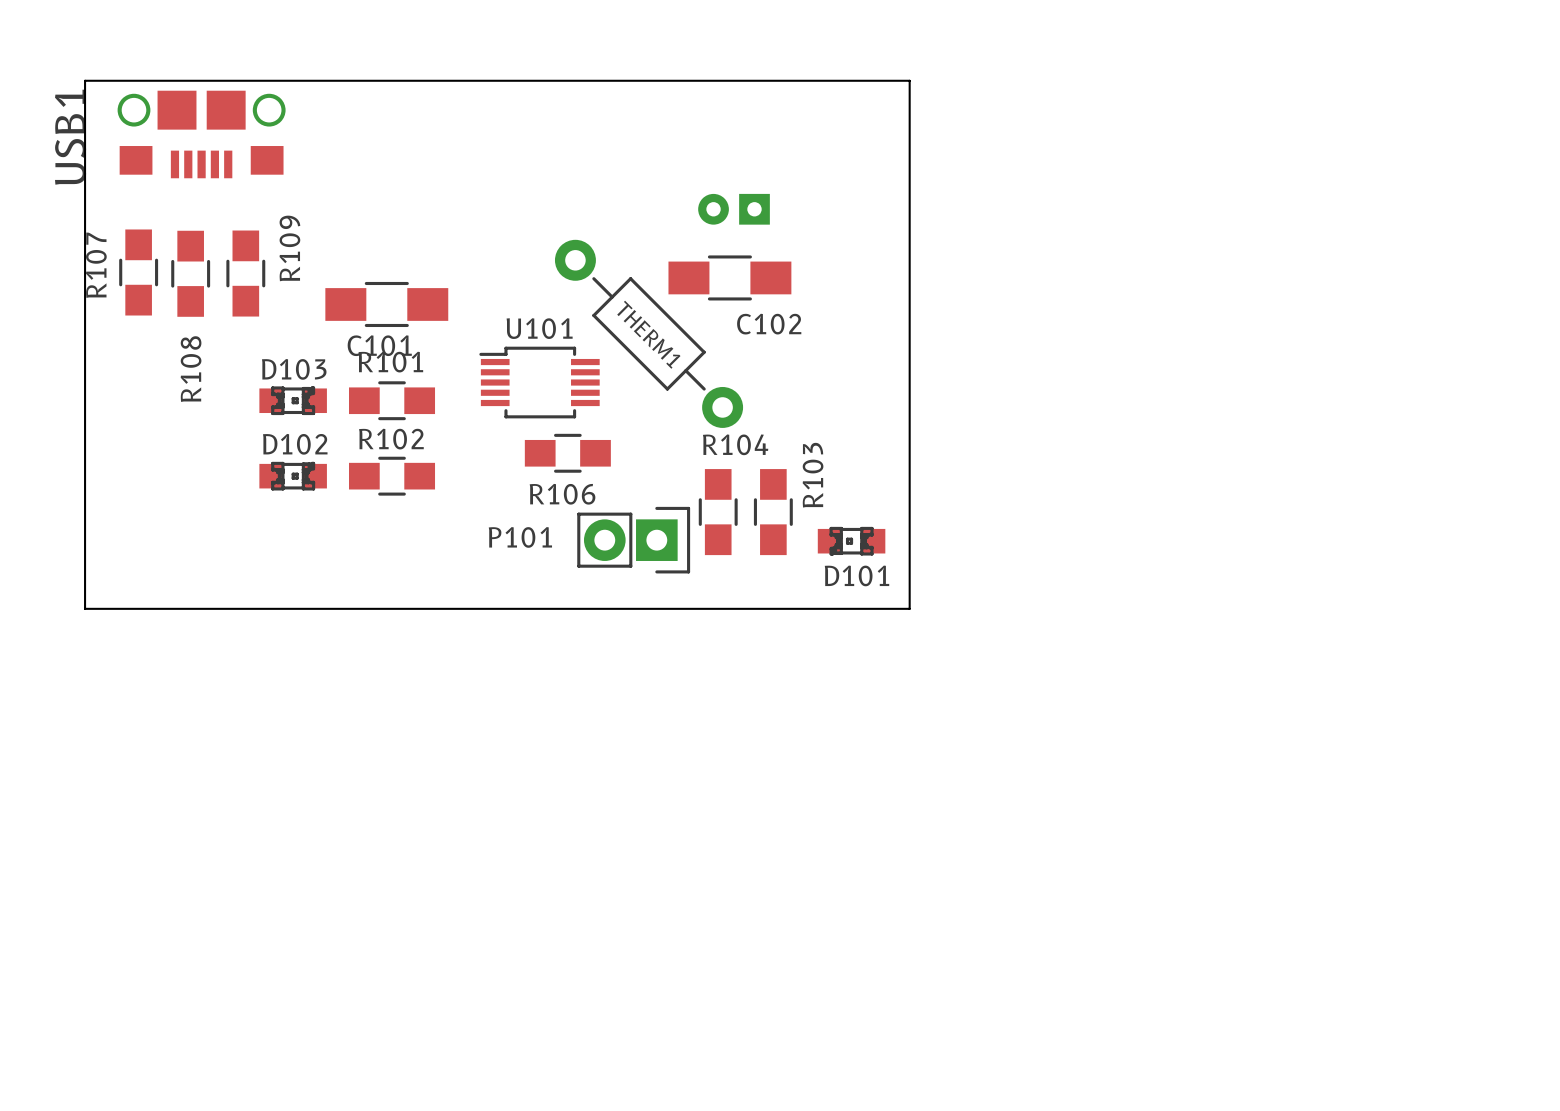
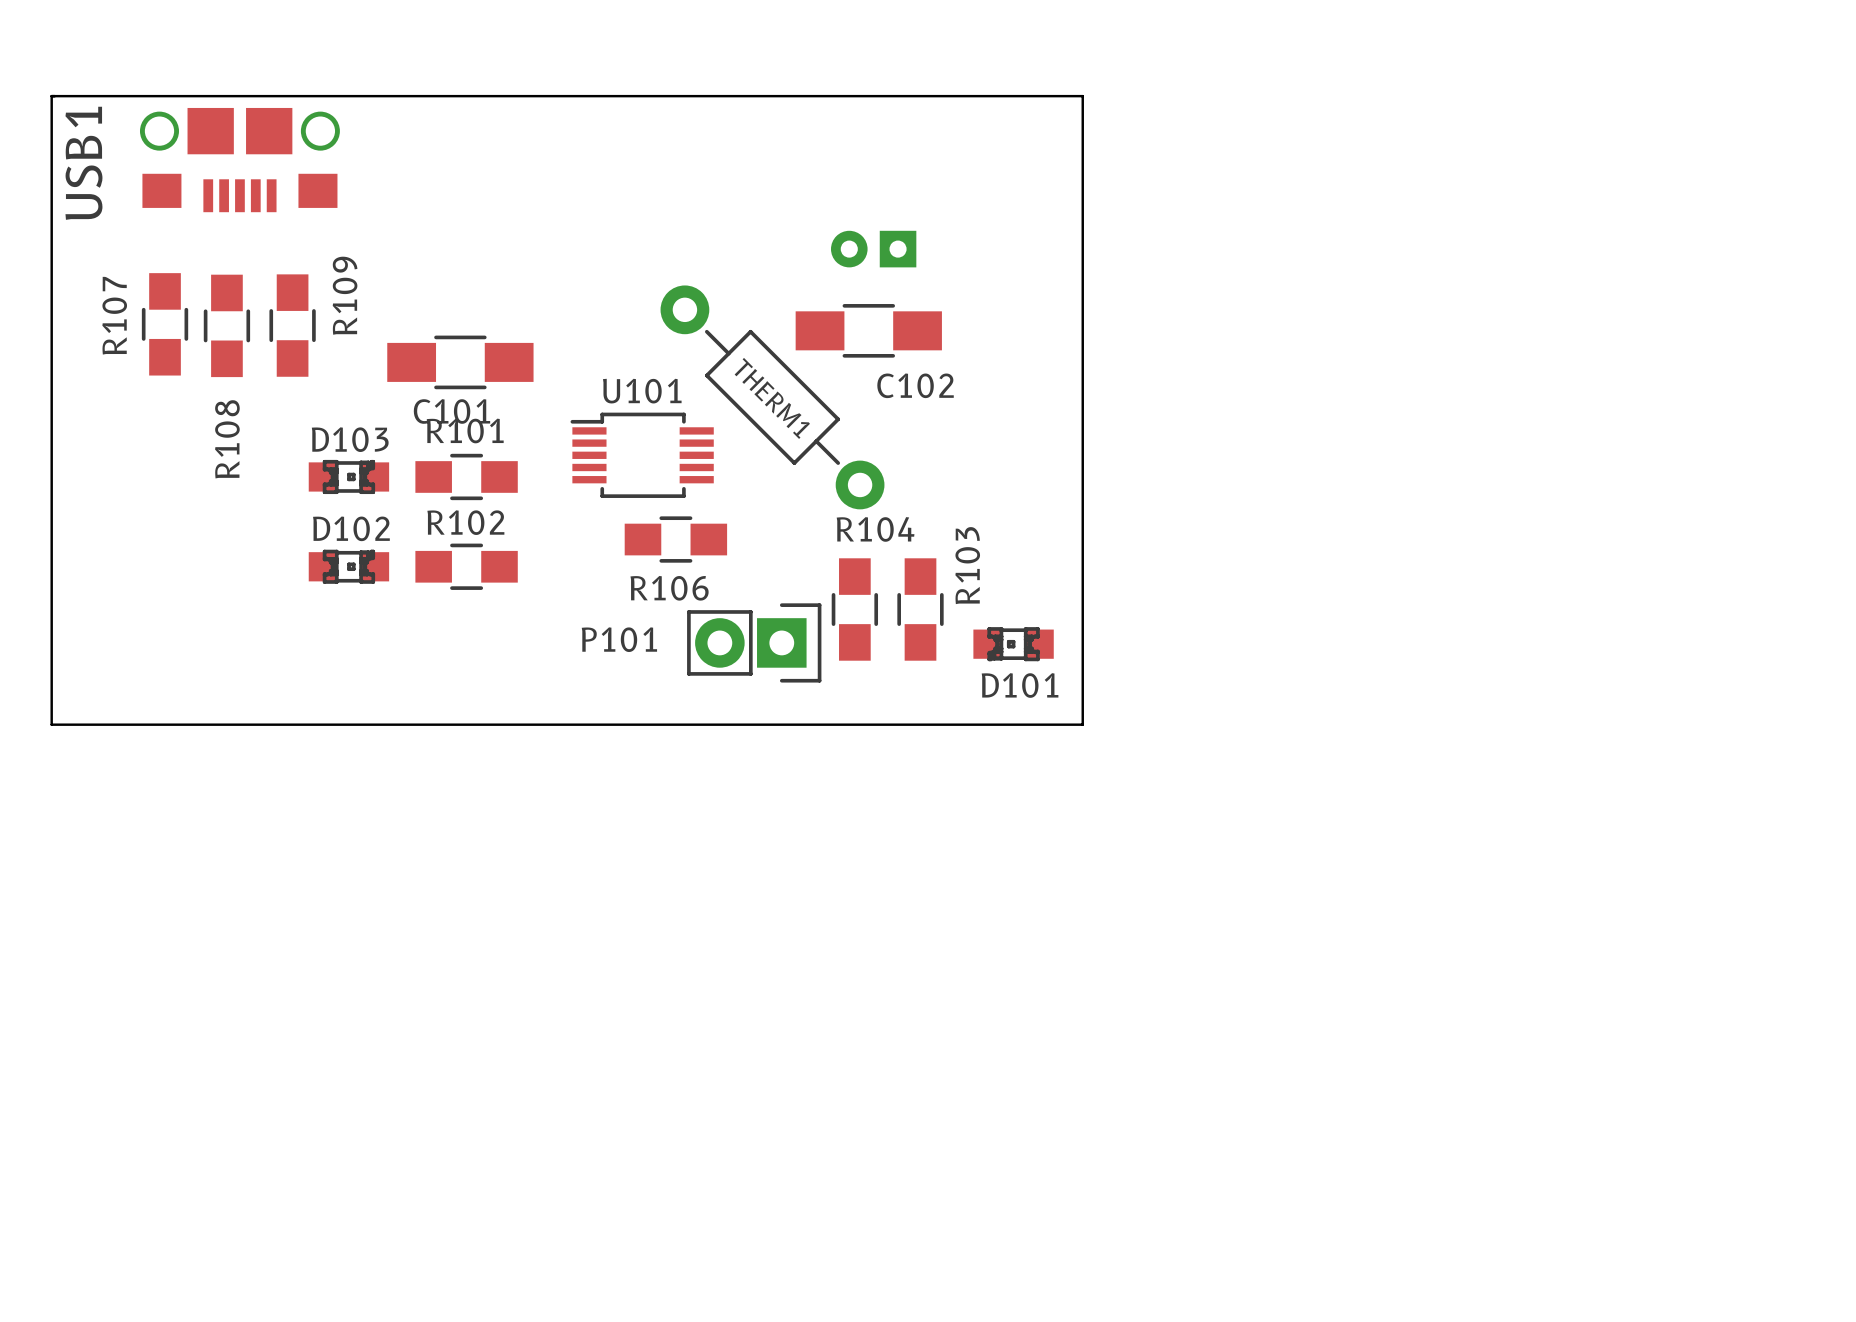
board edge: (85, 80) (85, 608) -> (101, 96) (51, 96) (51, 724) (101, 724)

